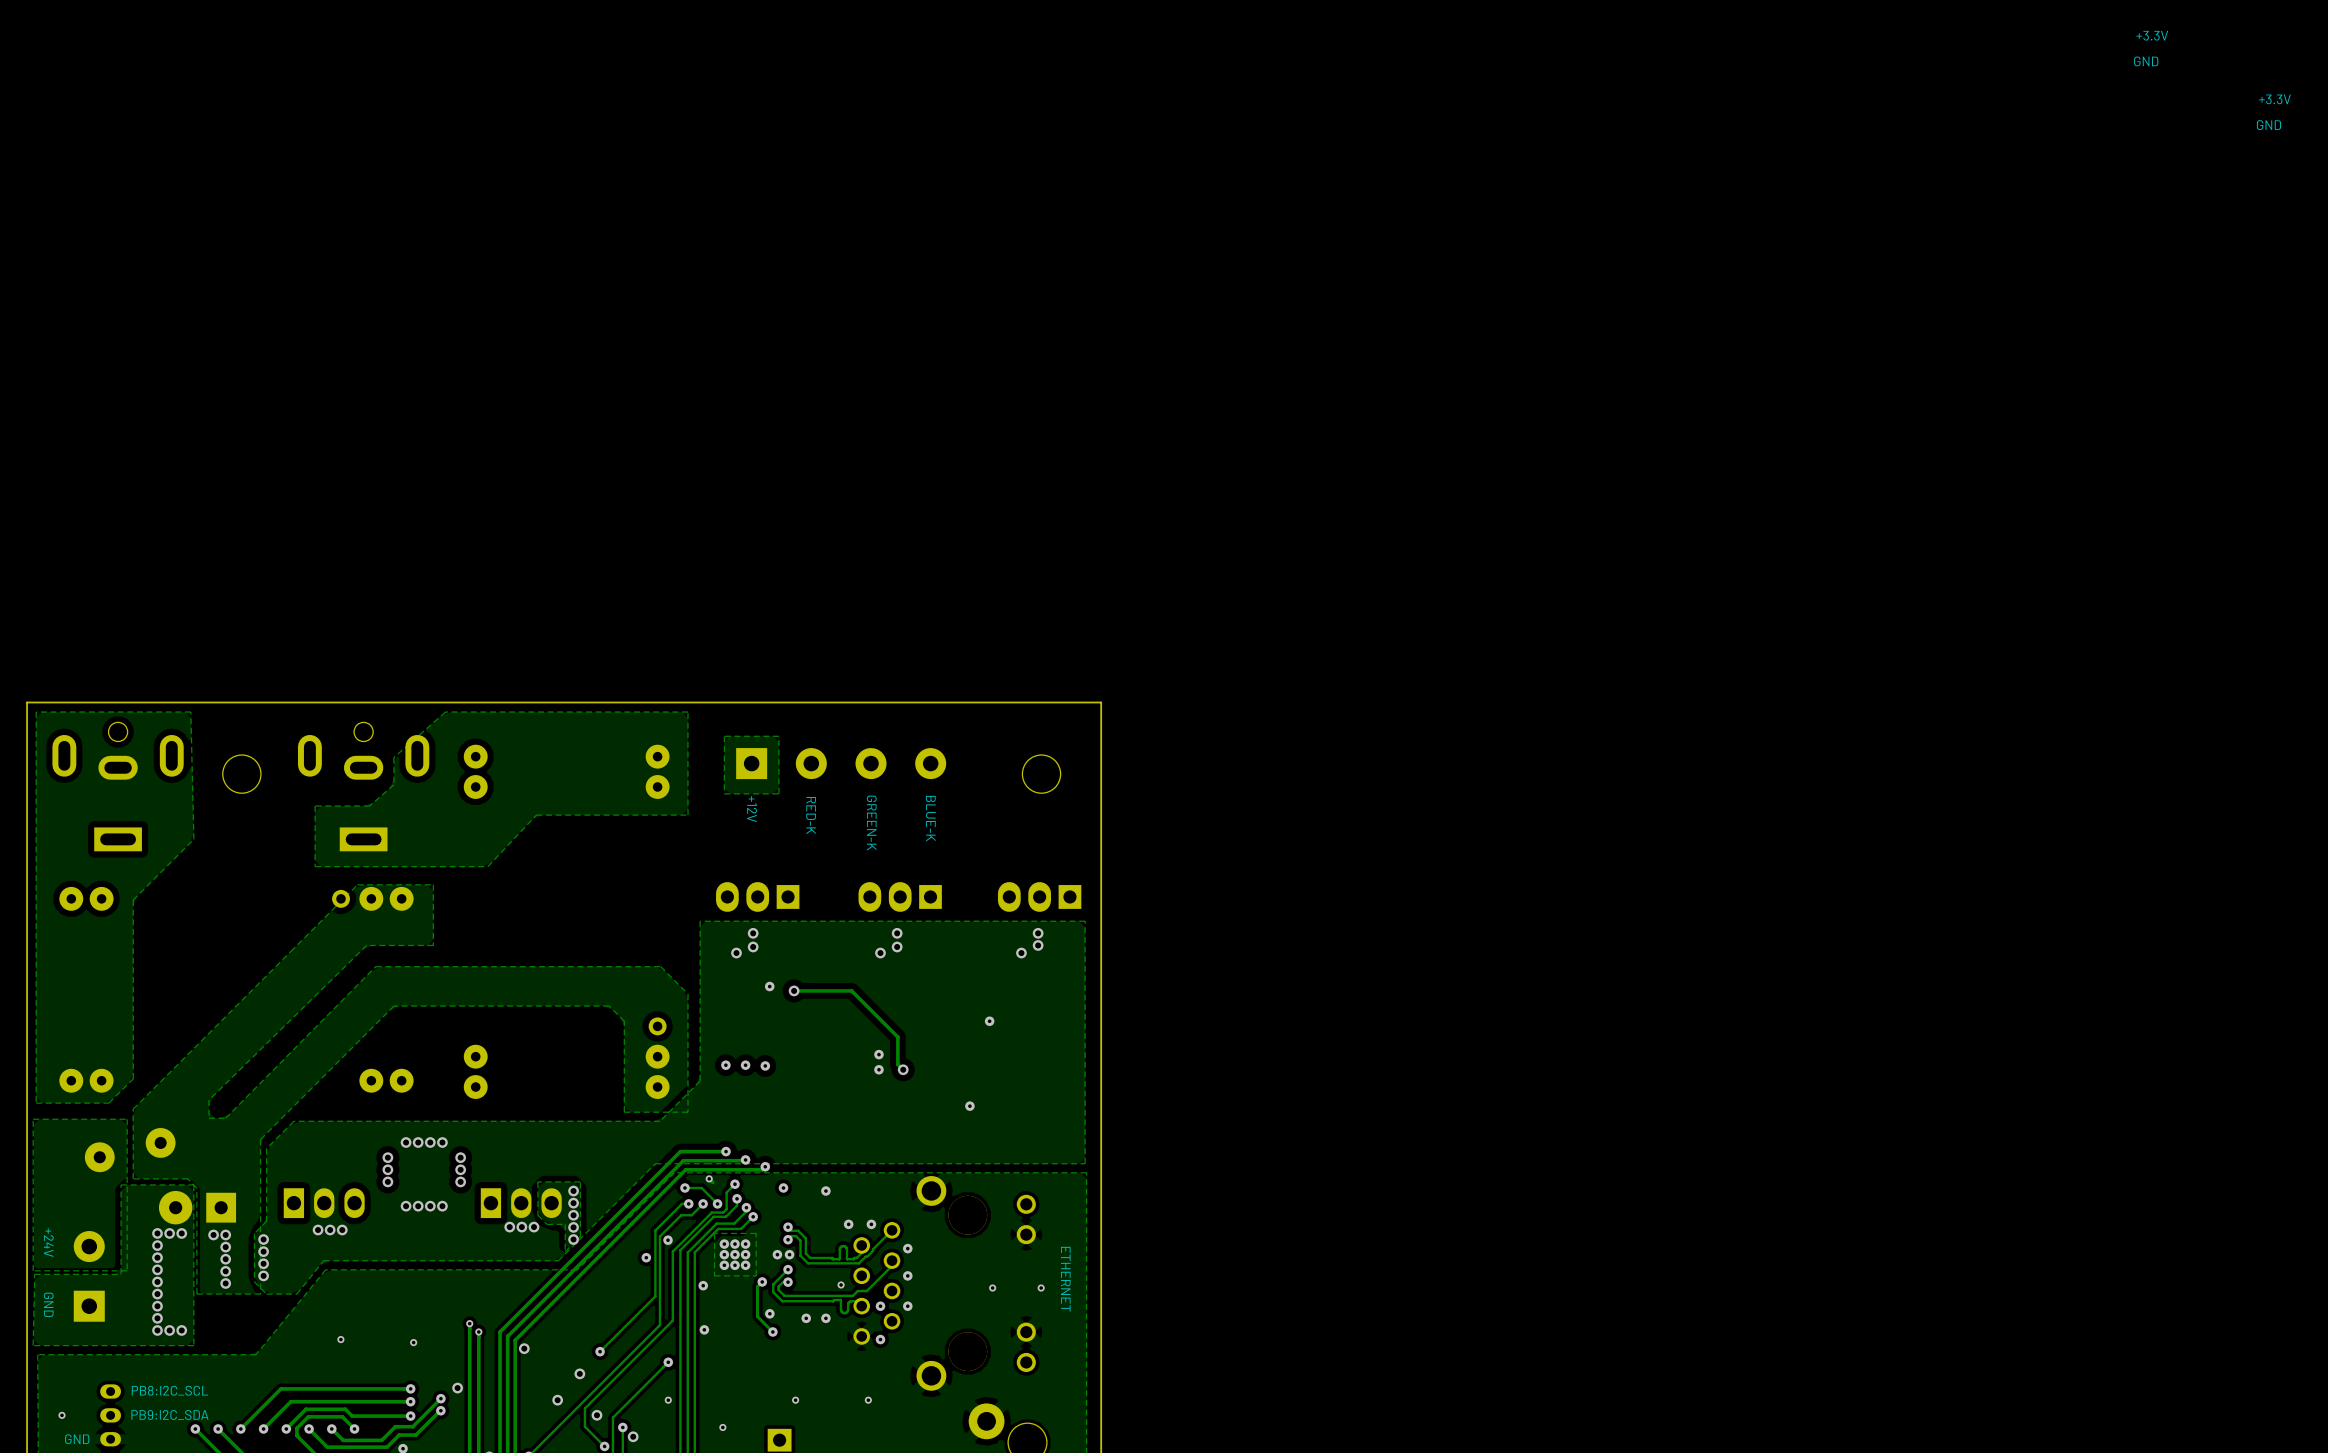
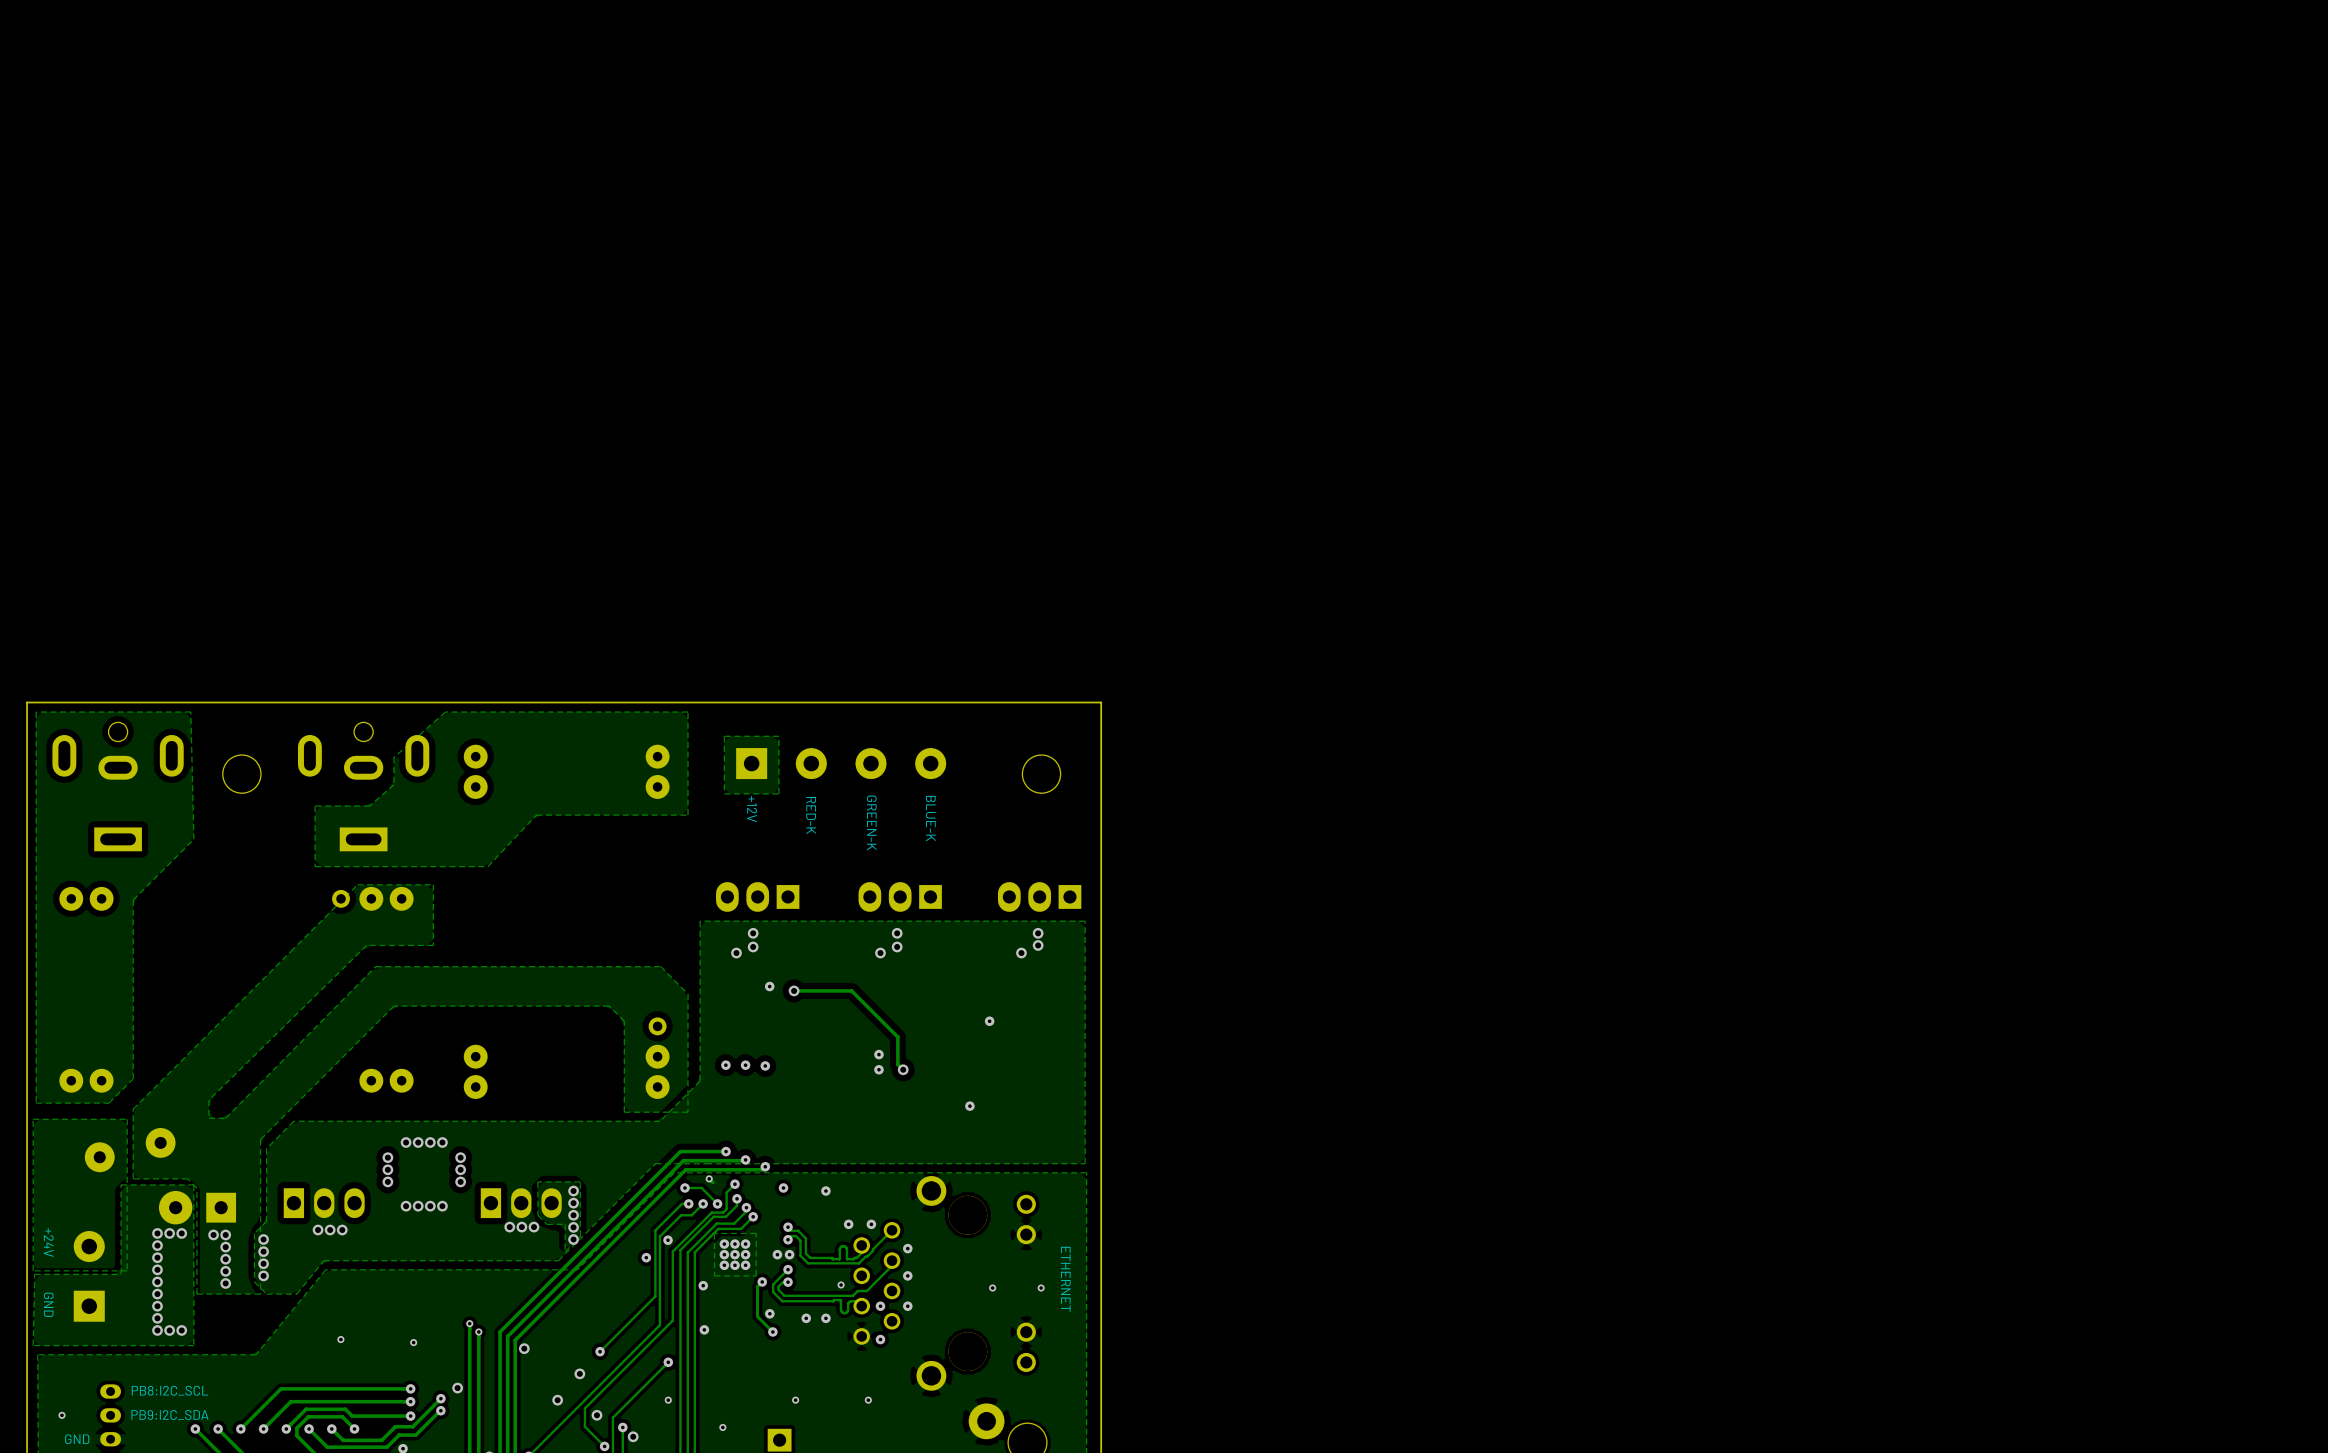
text: +3.3V (2152, 35) -> none
text: GND (2146, 61) -> none
text: +3.3V (2275, 99) -> none
text: GND (2268, 125) -> none

